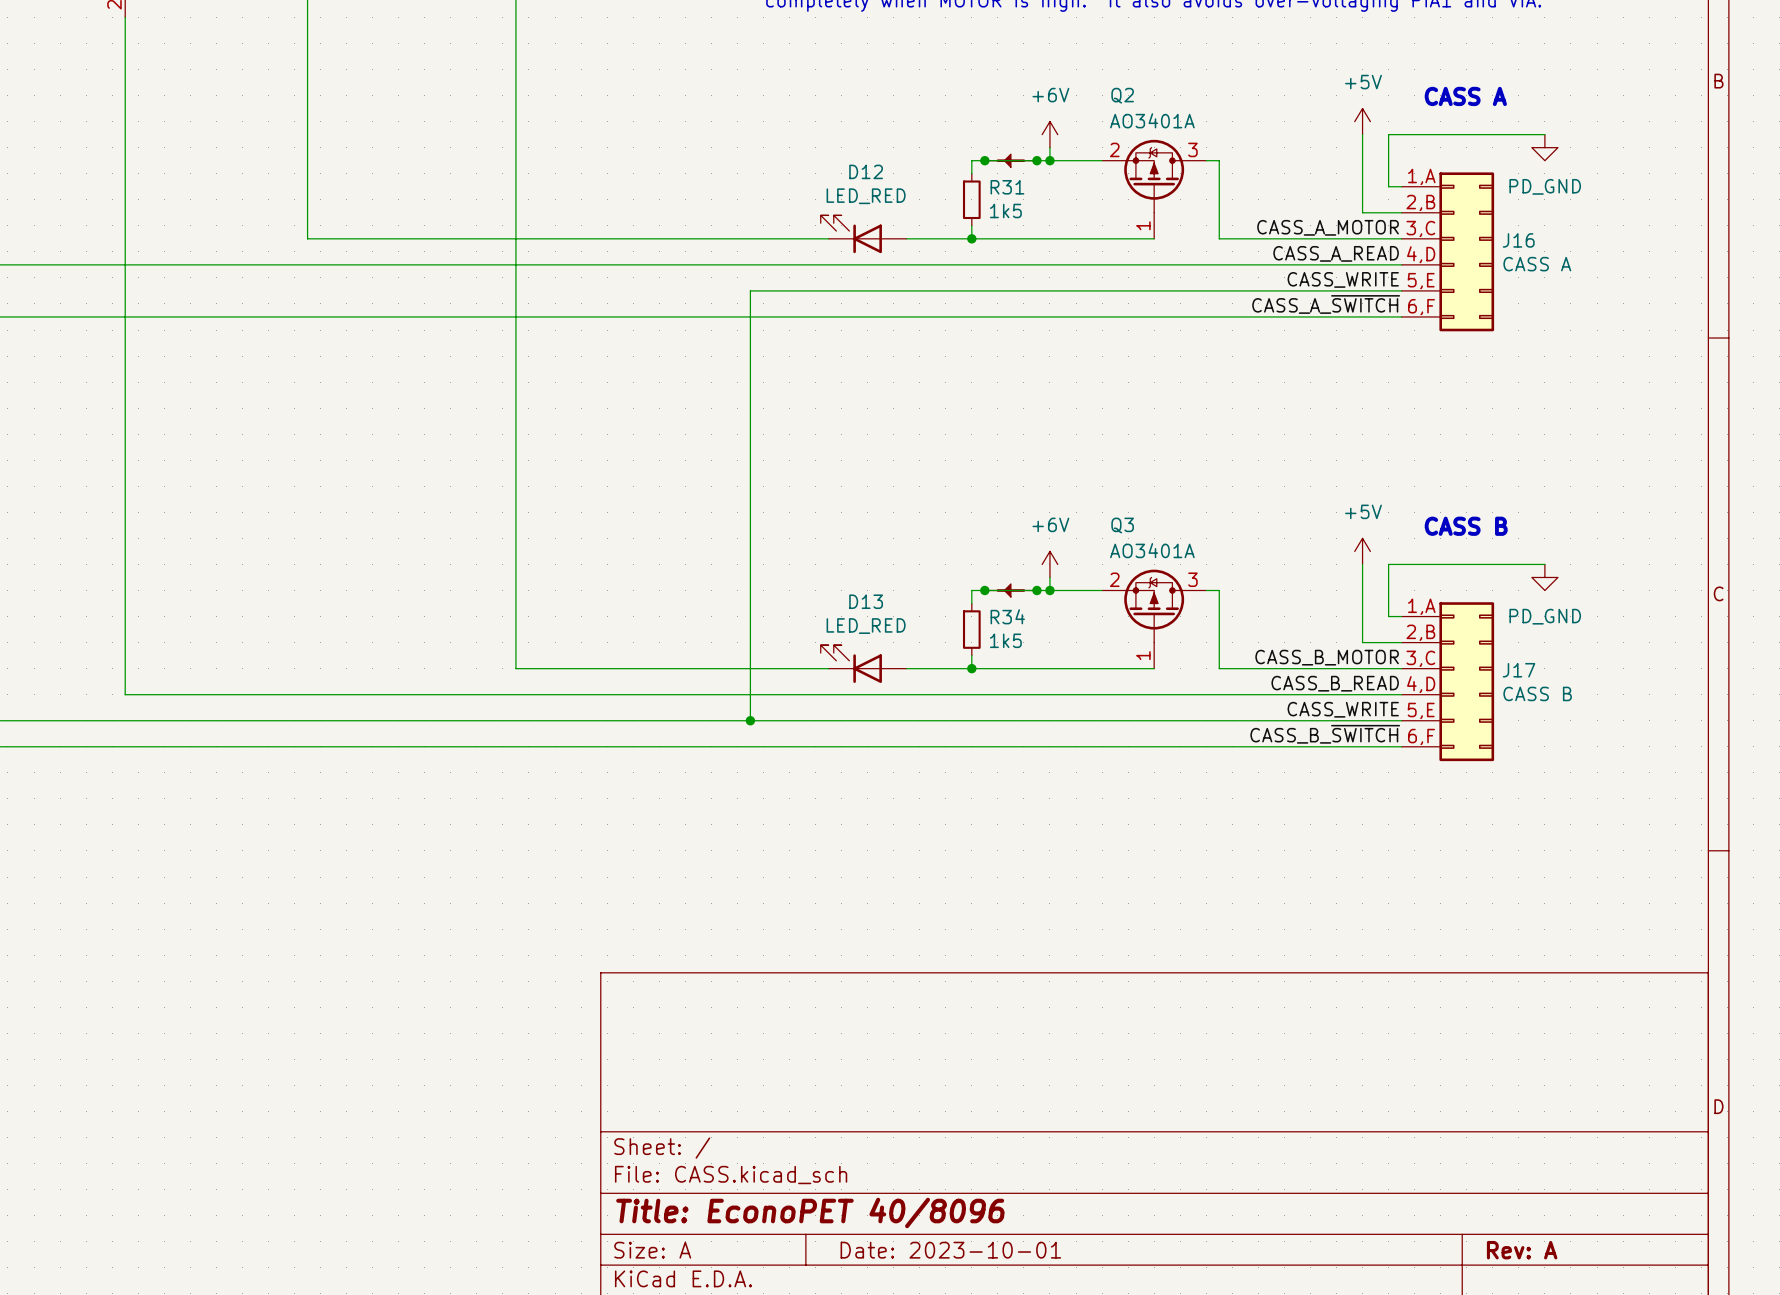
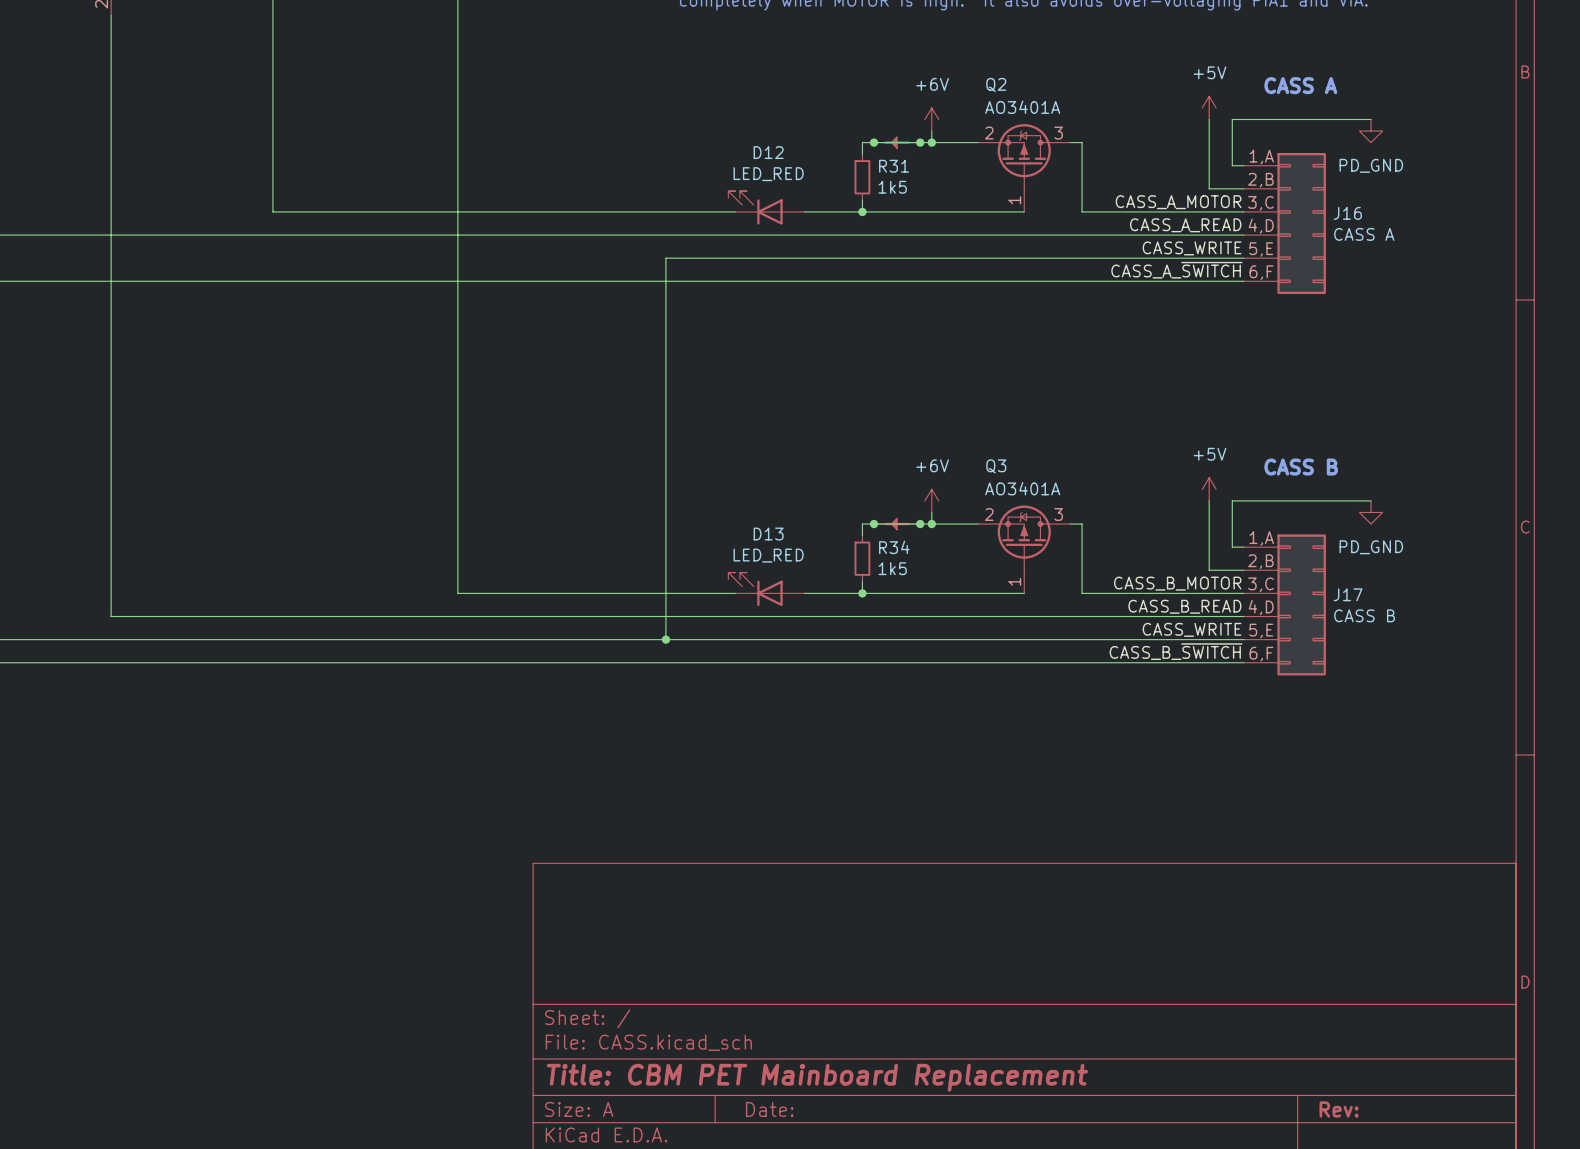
title block: Title: EconoPET 40/8096 (810, 1212) -> Title: CBM PET Mainboard Replacement (817, 1077)
title block: Date: 2023-10-01 (950, 1250) -> Date: (769, 1109)
title block: Rev: A (1522, 1250) -> Rev: (1339, 1109)

